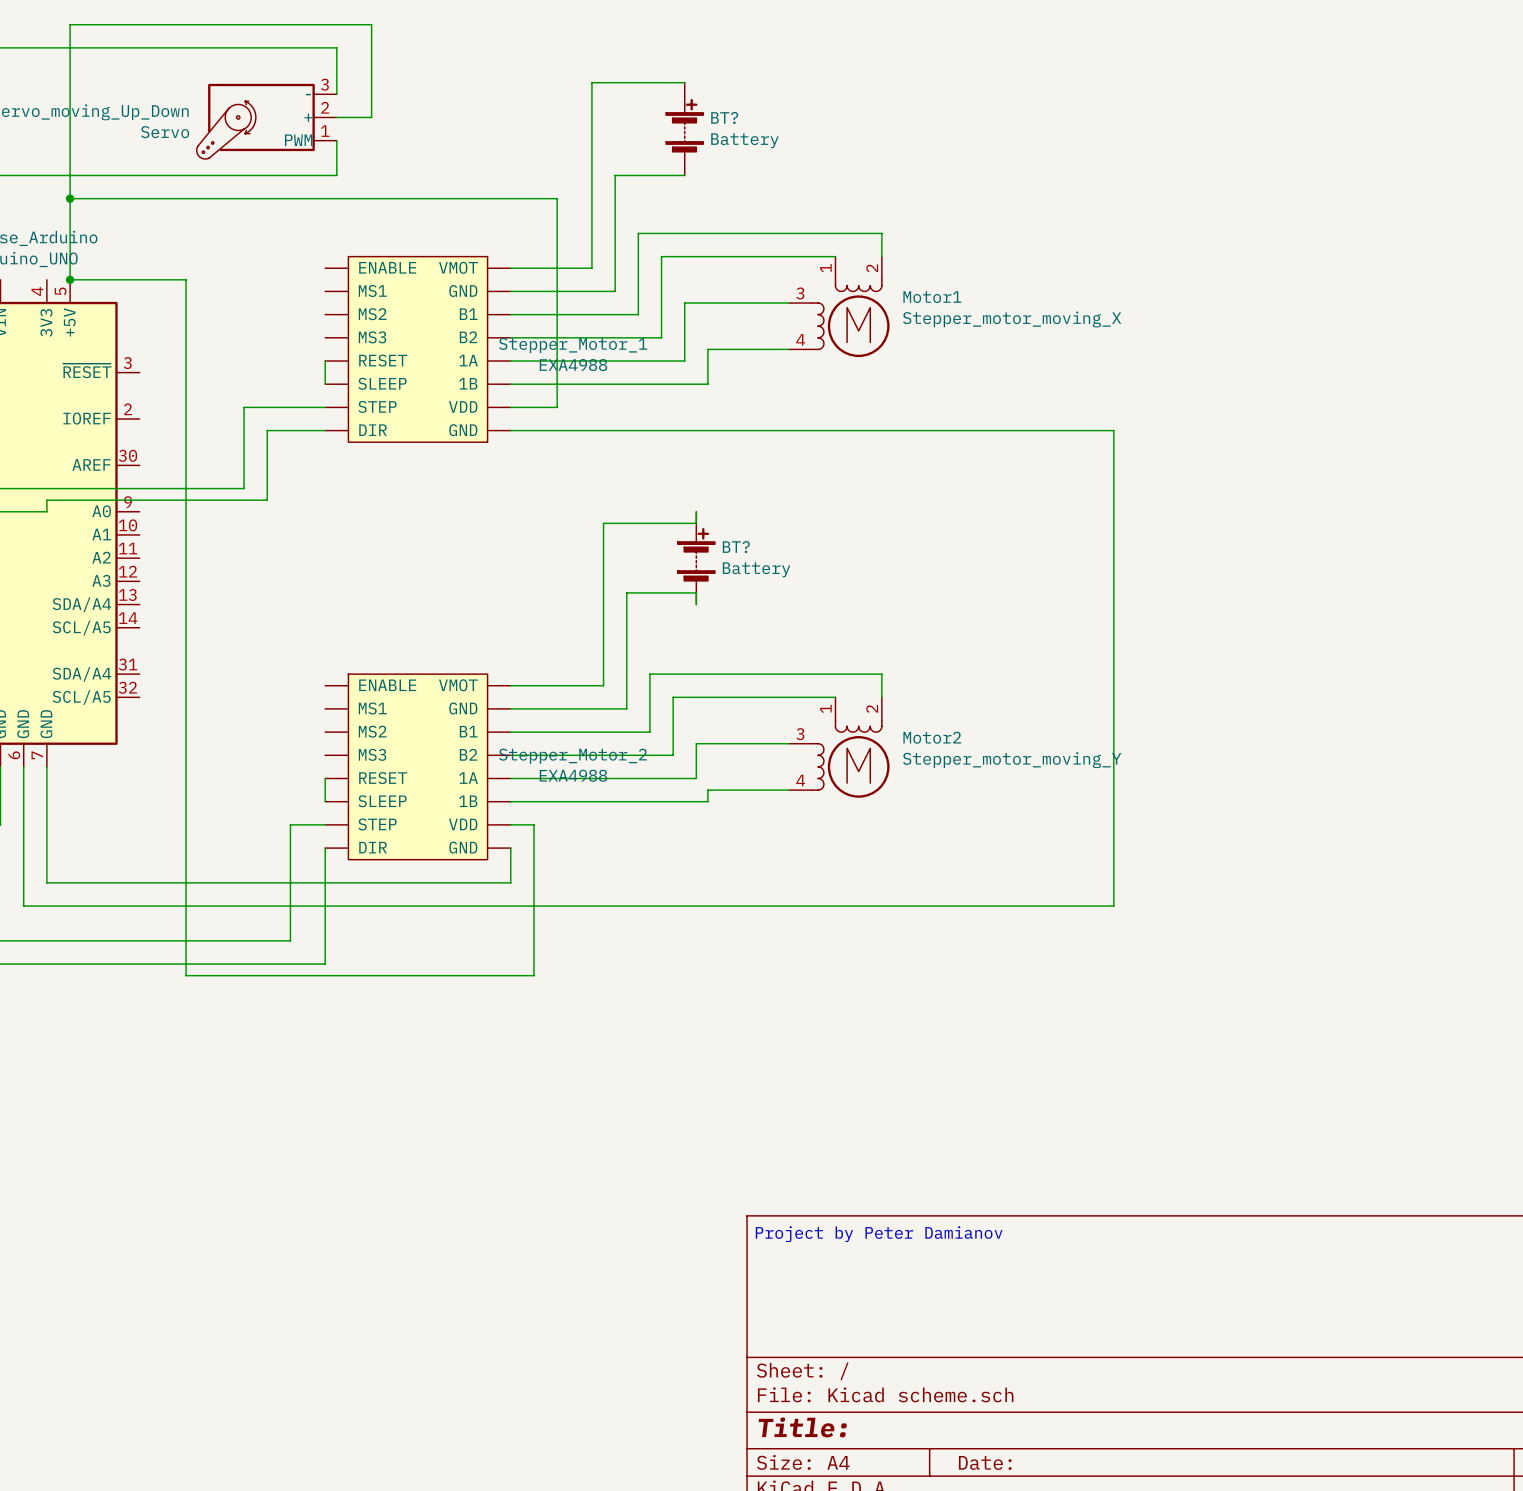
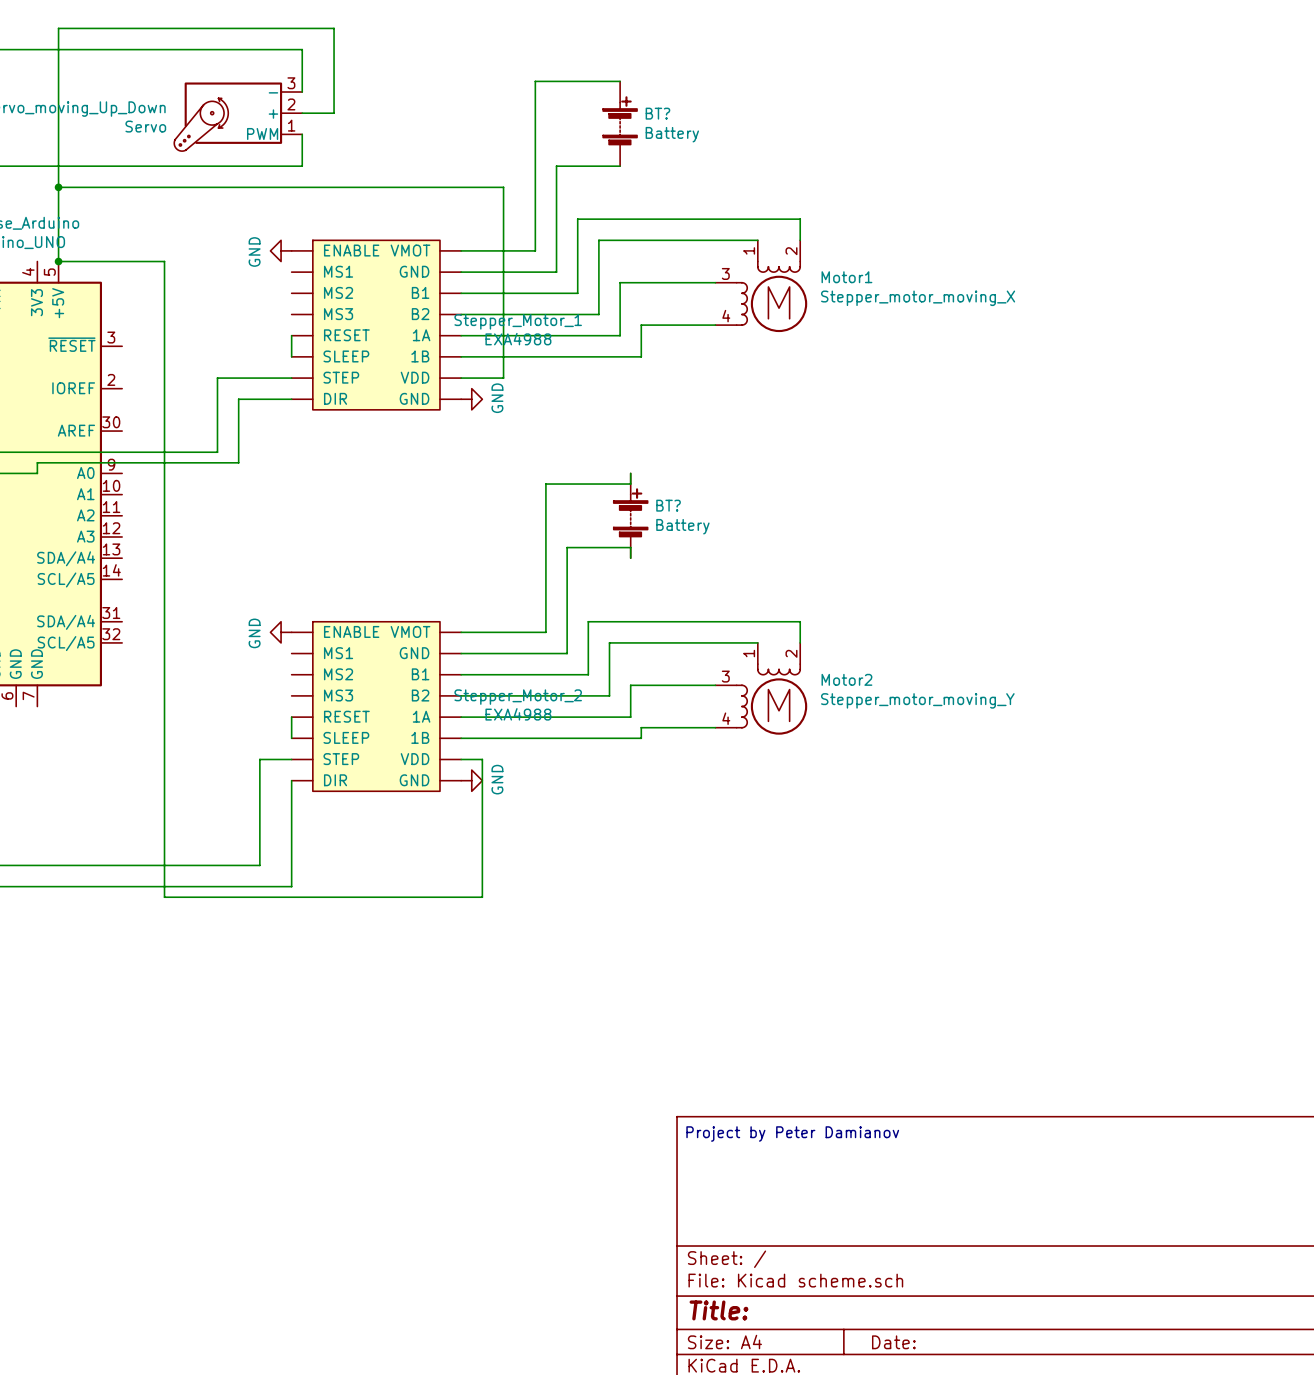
power symbol: none -> GND (281, 250)
wire: (510, 430) (1113, 430) (1113, 906) (23, 906) (23, 766) -> none
power symbol: none -> GND (471, 399)
power symbol: none -> GND (281, 632)
wire: (46, 766) (46, 882) (510, 882) (510, 848) -> none
power symbol: none -> GND (471, 780)

